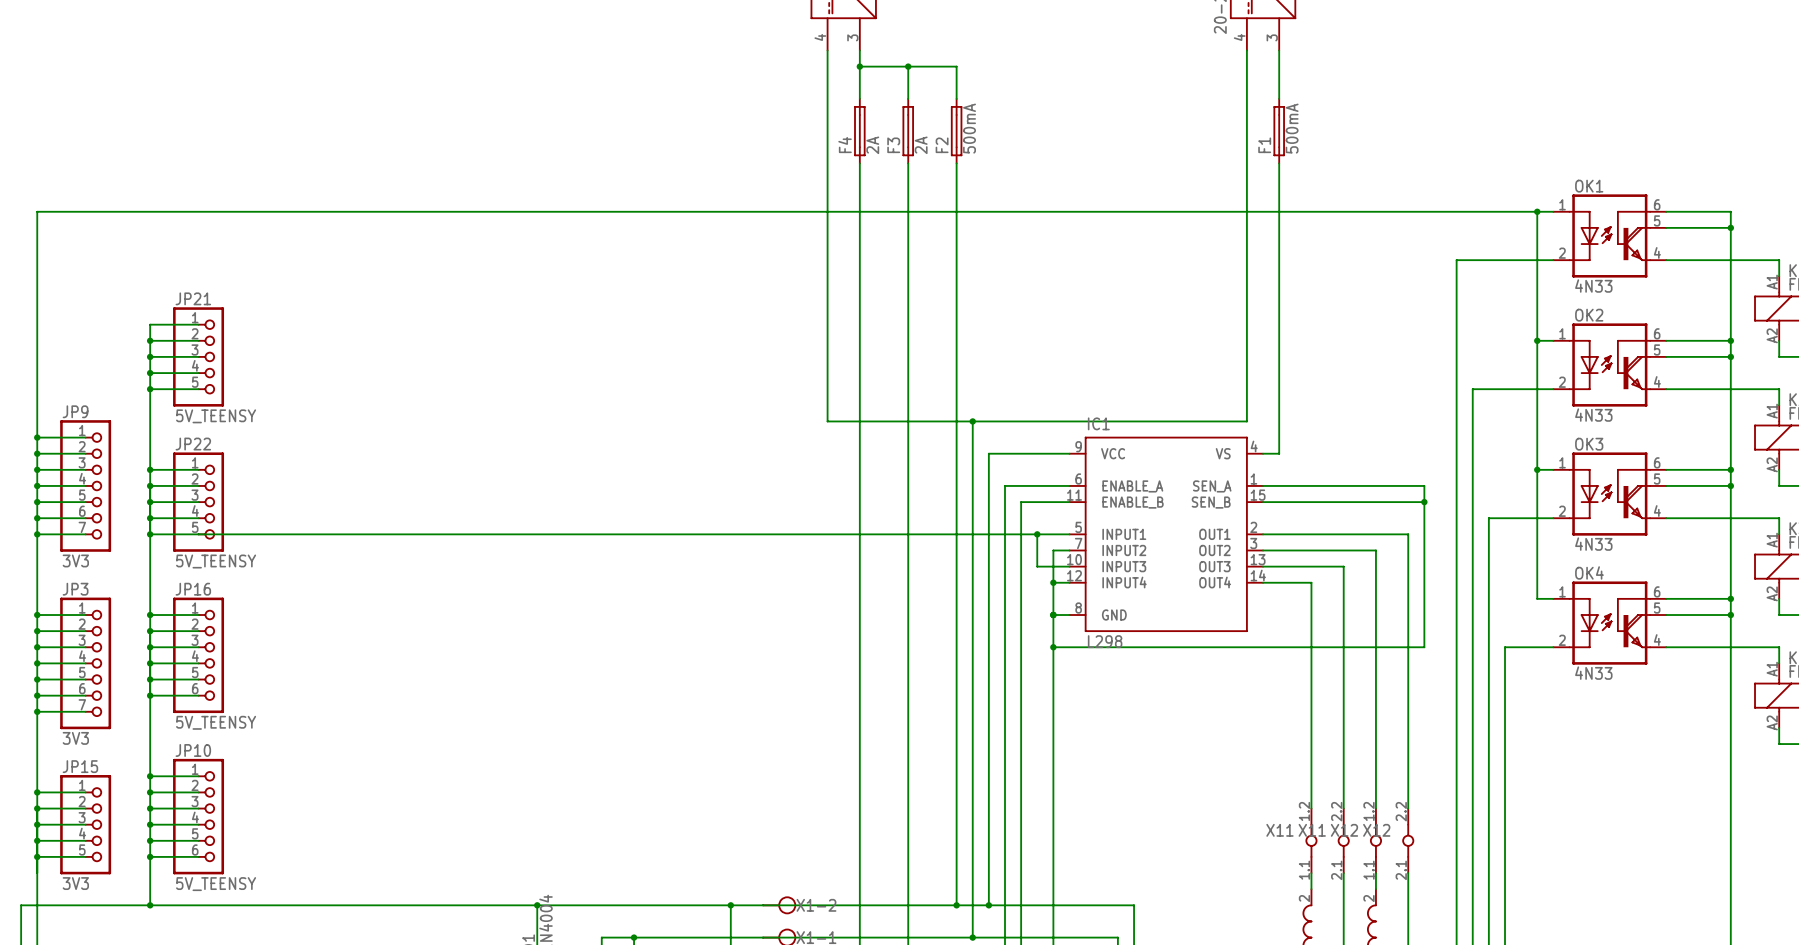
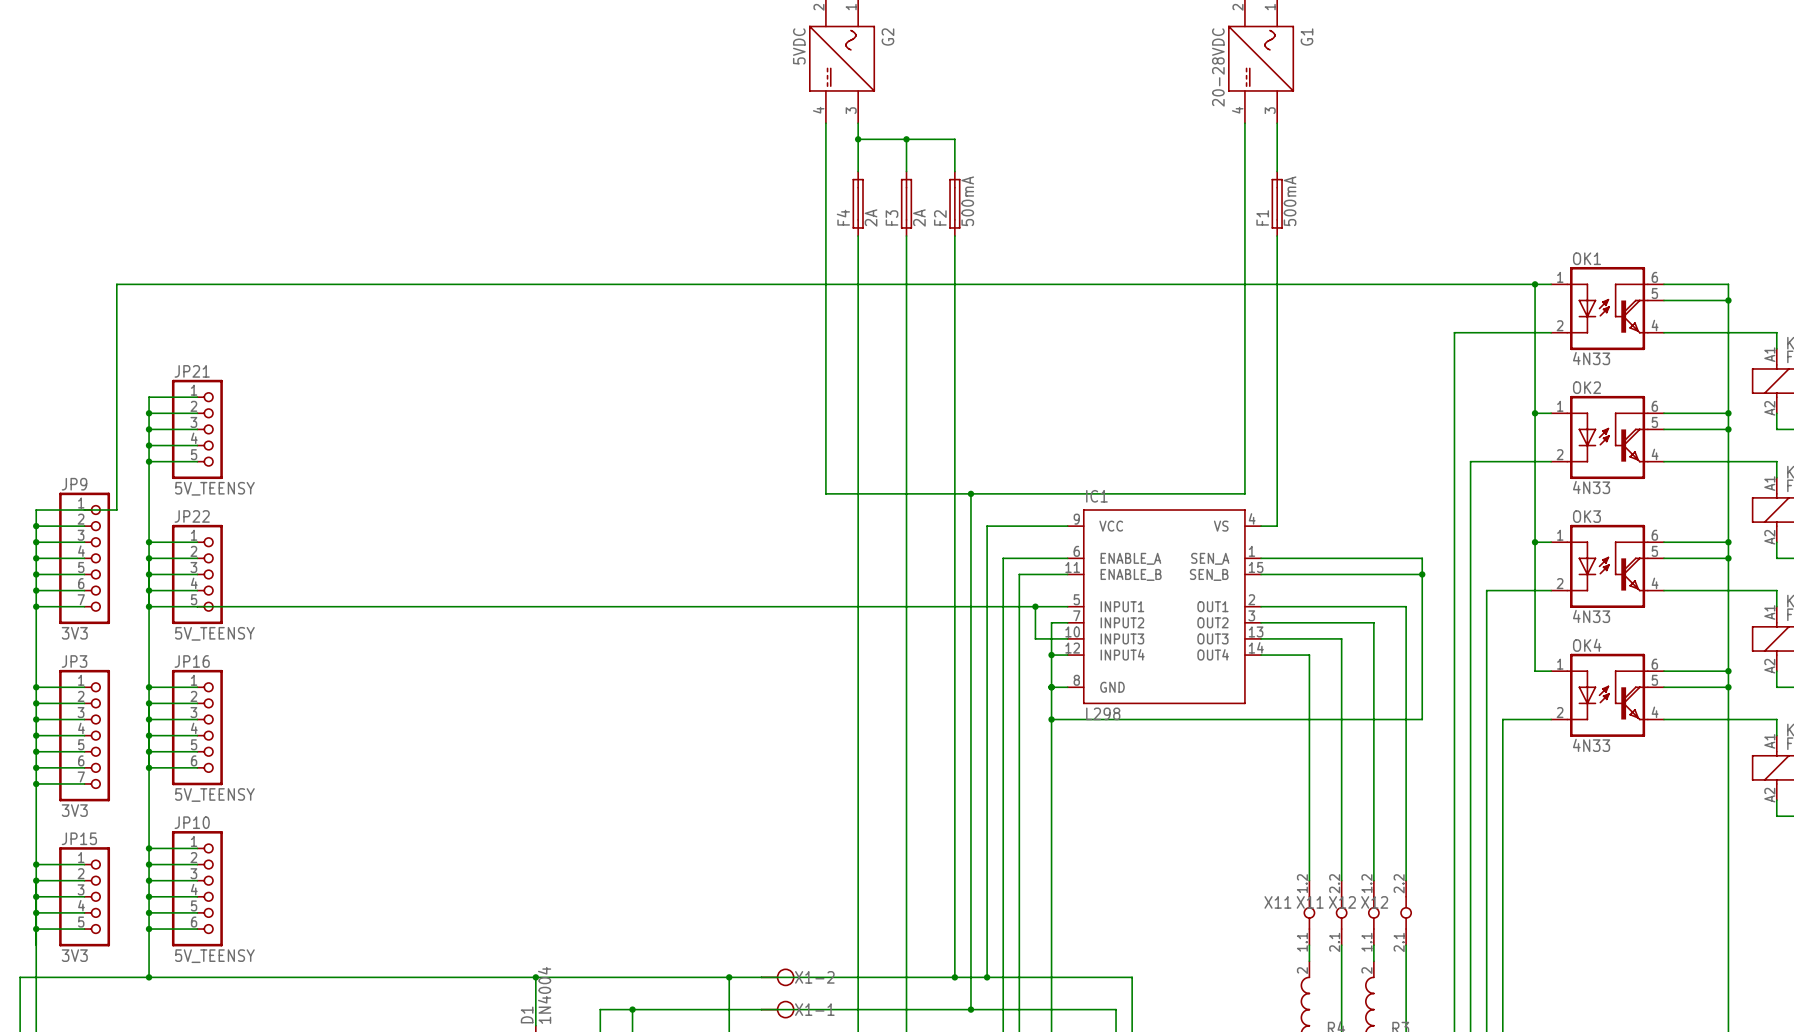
wire: (117, 211) (37, 211) (37, 437) -> (116, 284) (116, 510) (84, 510)
junction: (37, 437) -> none

